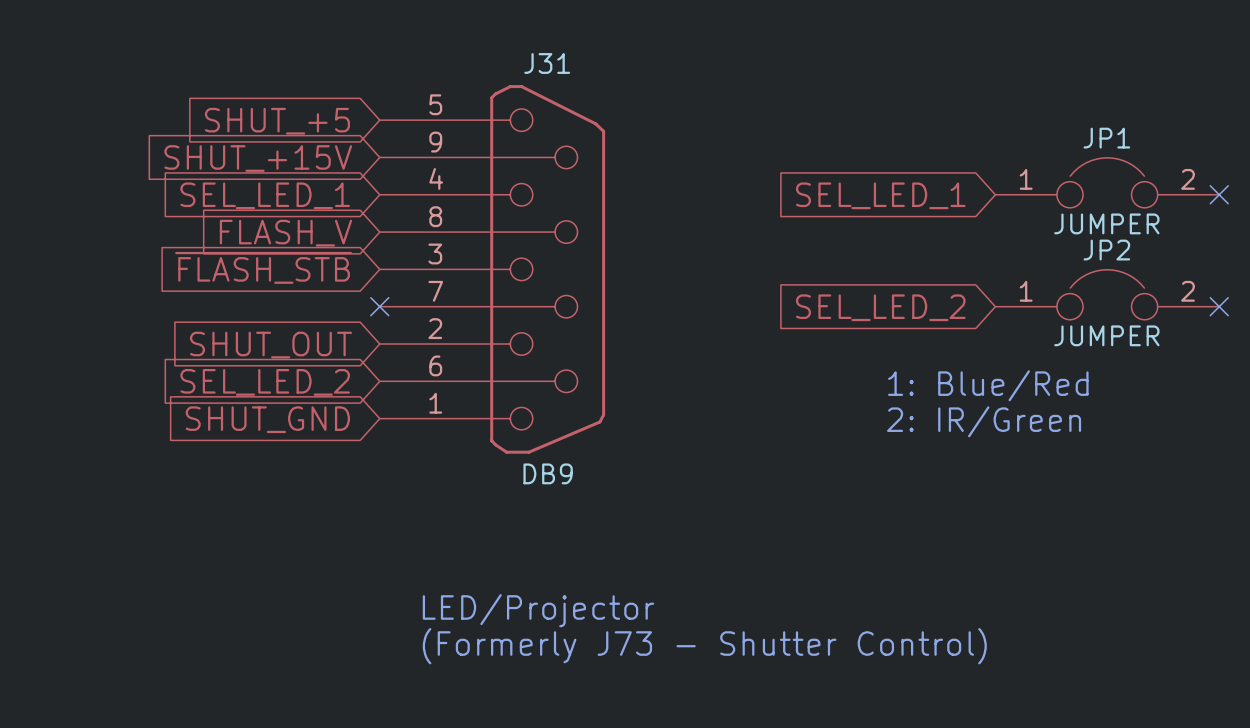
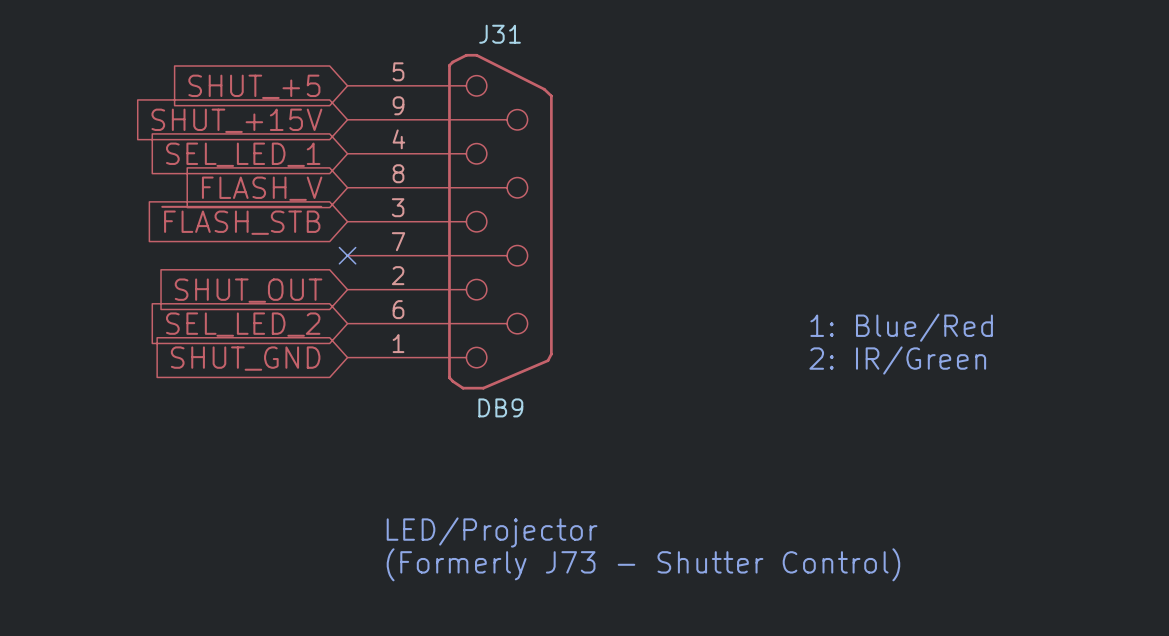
JP1: JUMPER (1107, 182) -> none
no-connect mark: (1219, 194) -> none
global label: SEL_LED_1 (880, 195) -> none
JP2: JUMPER (1107, 294) -> none
no-connect mark: (1219, 306) -> none
global label: SEL_LED_2 (880, 307) -> none

